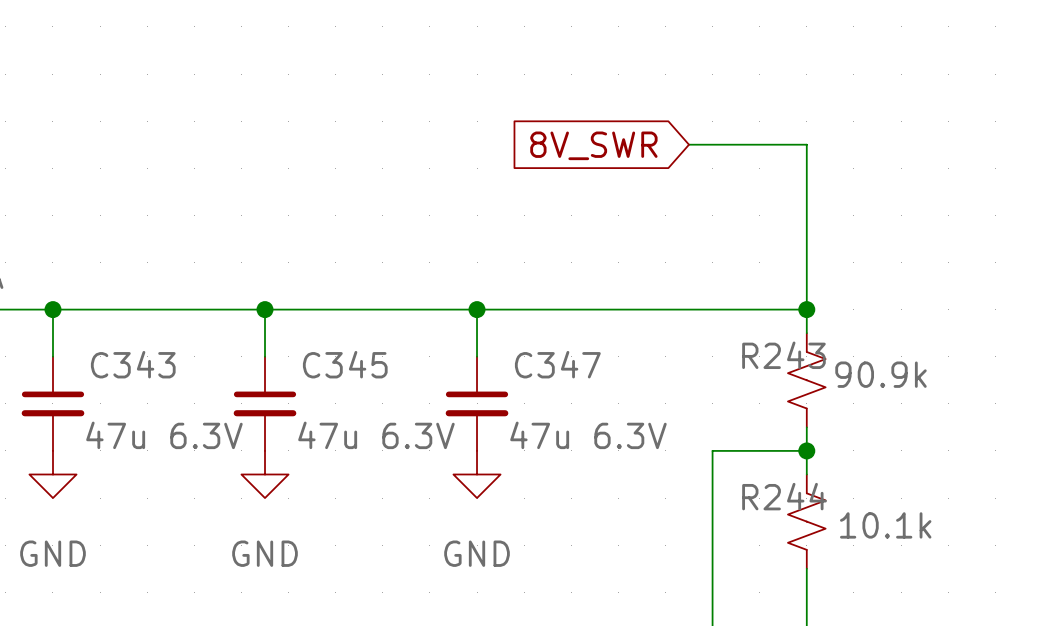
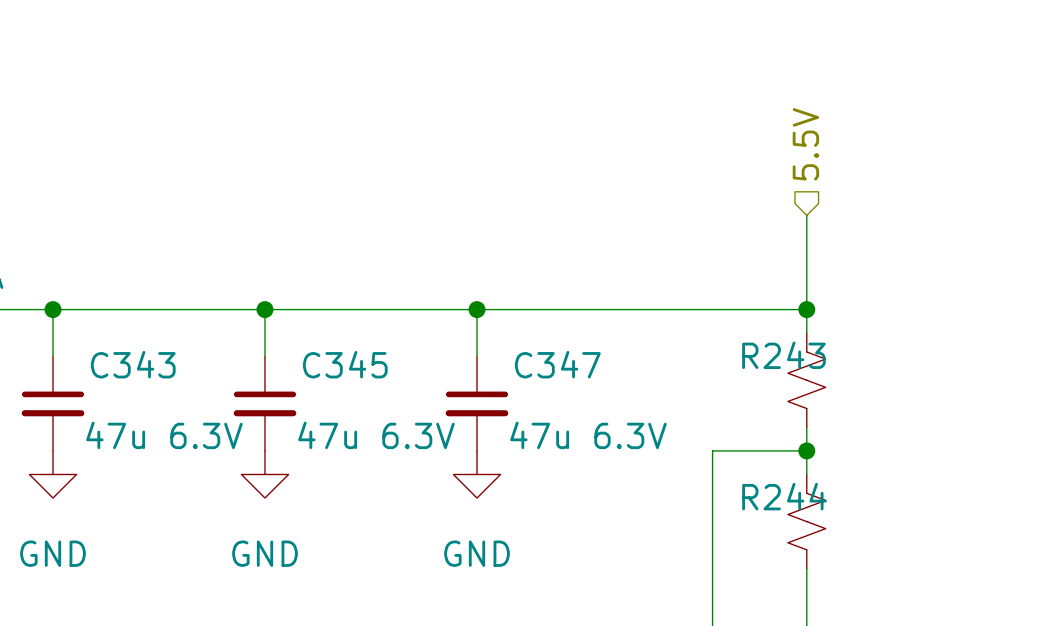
wire: (689, 144) (806, 144) (806, 215) -> none
hierarchical label: none -> 5.5V (805, 144)
global label: 8V_SWR (593, 145) -> none
R243 value: 90.9k (881, 374) -> none
R244 value: 10.1k (885, 525) -> none

